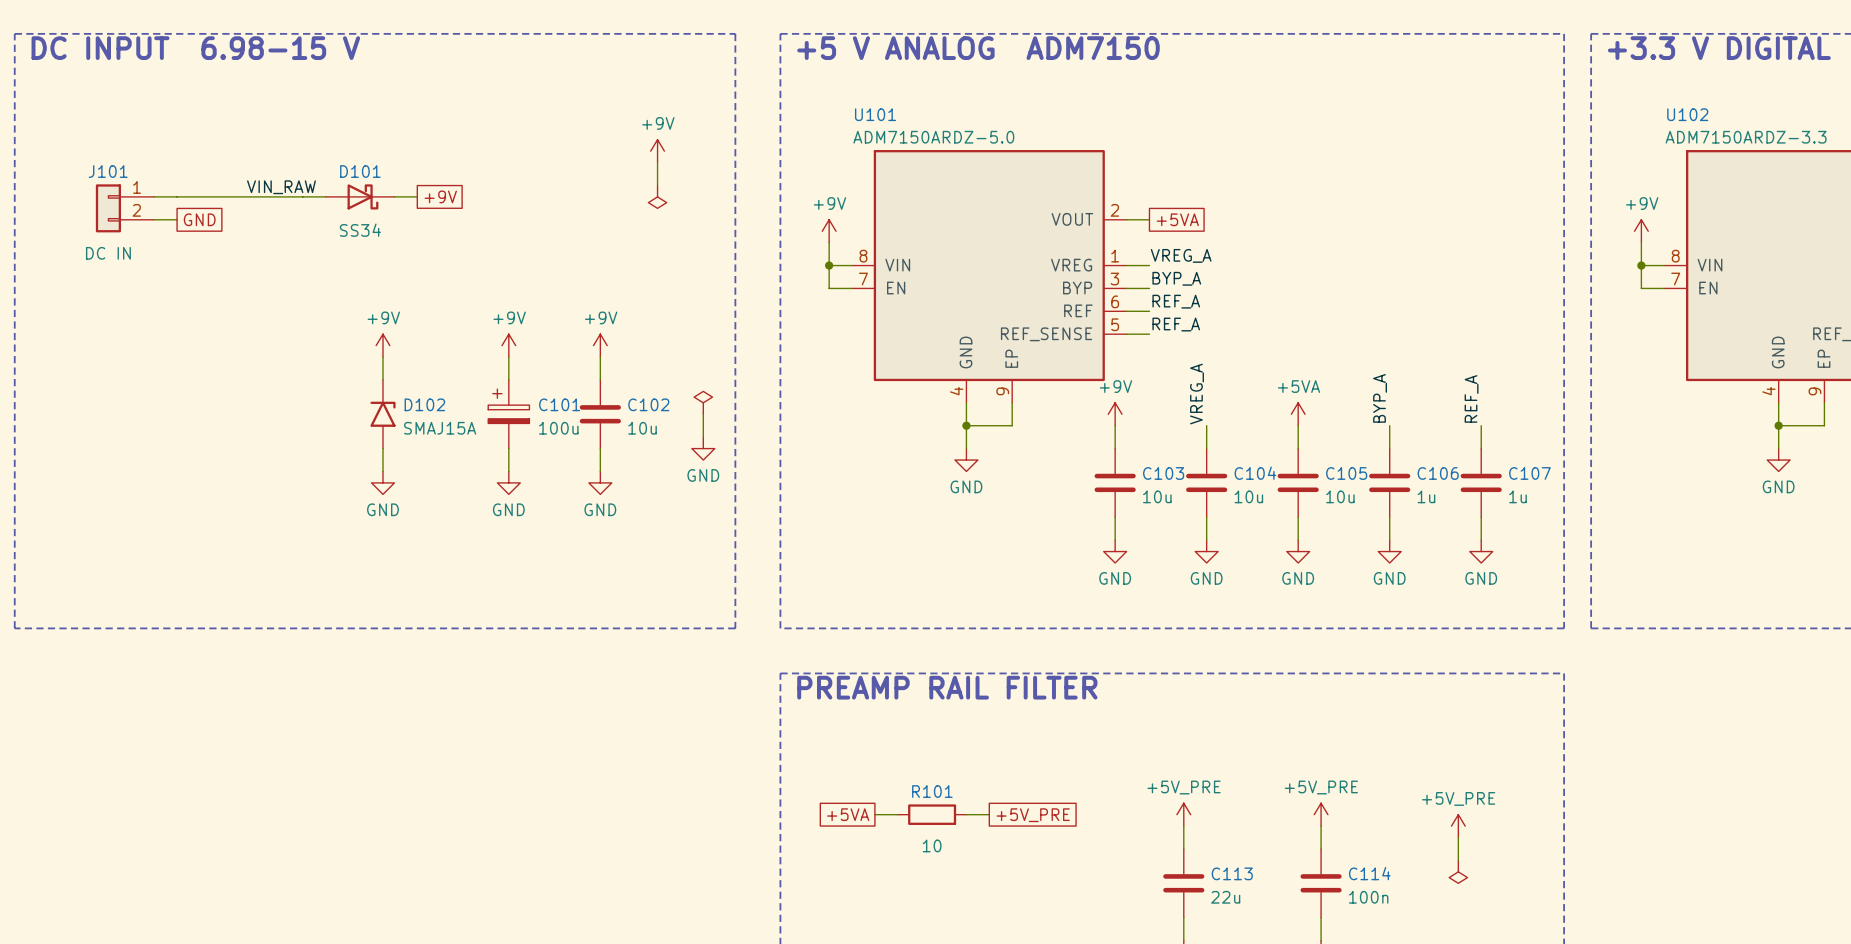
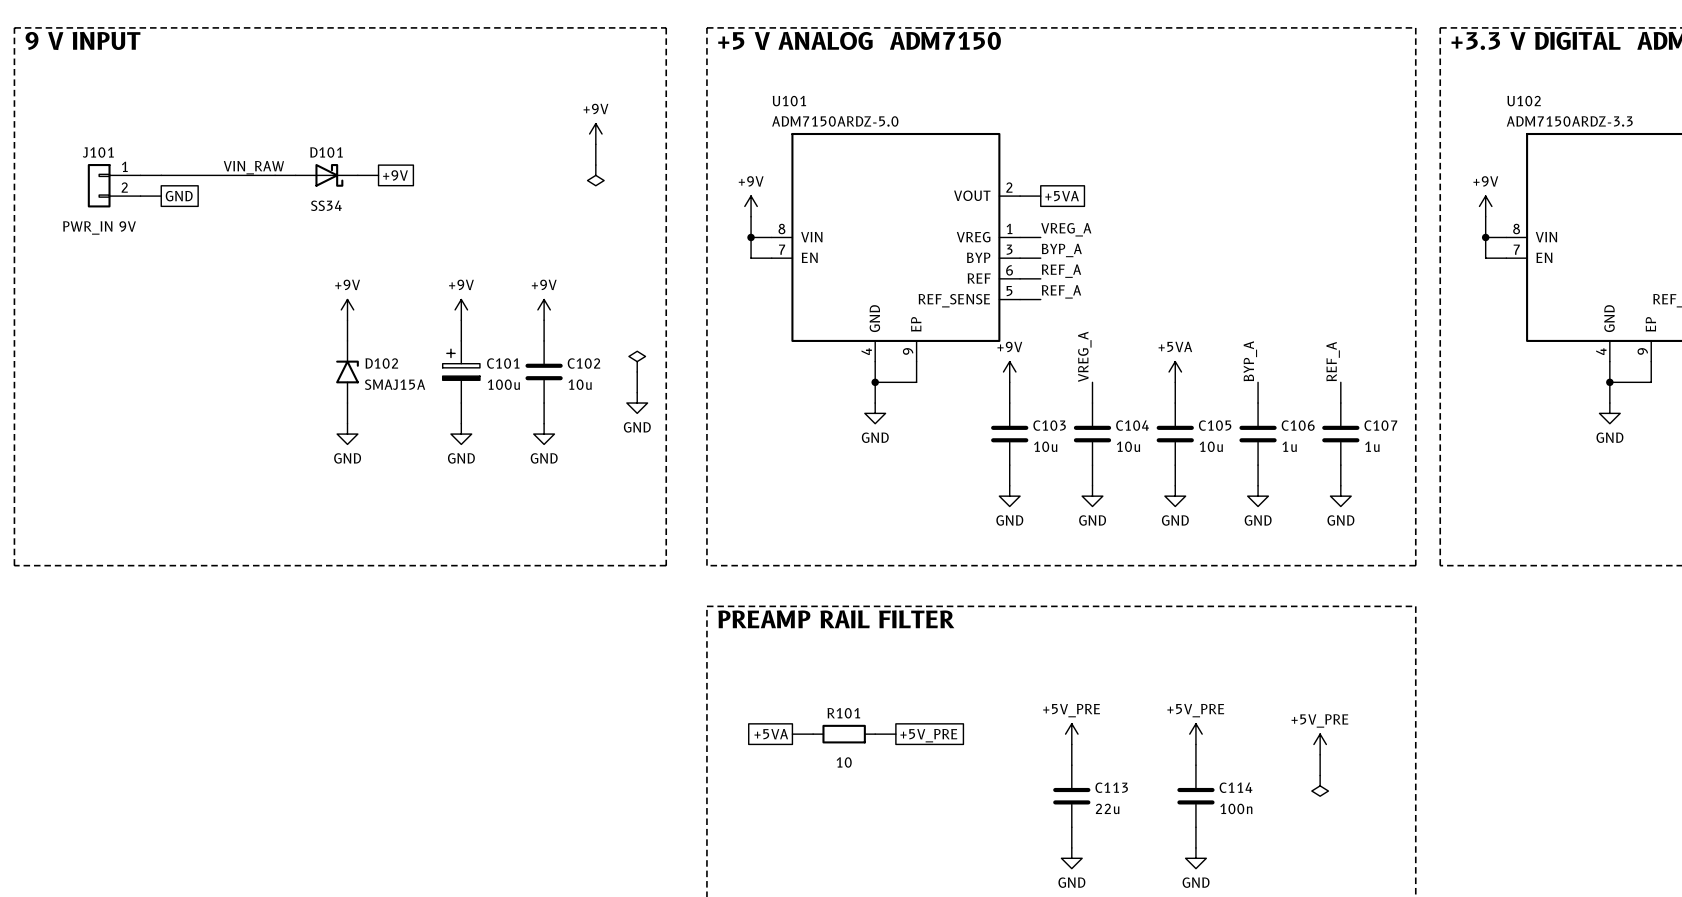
text: DC INPUT 6.98-15 V (195, 48) -> 9 V INPUT (83, 40)
J101 value: DC IN (108, 253) -> PWR_IN 9V (99, 227)

